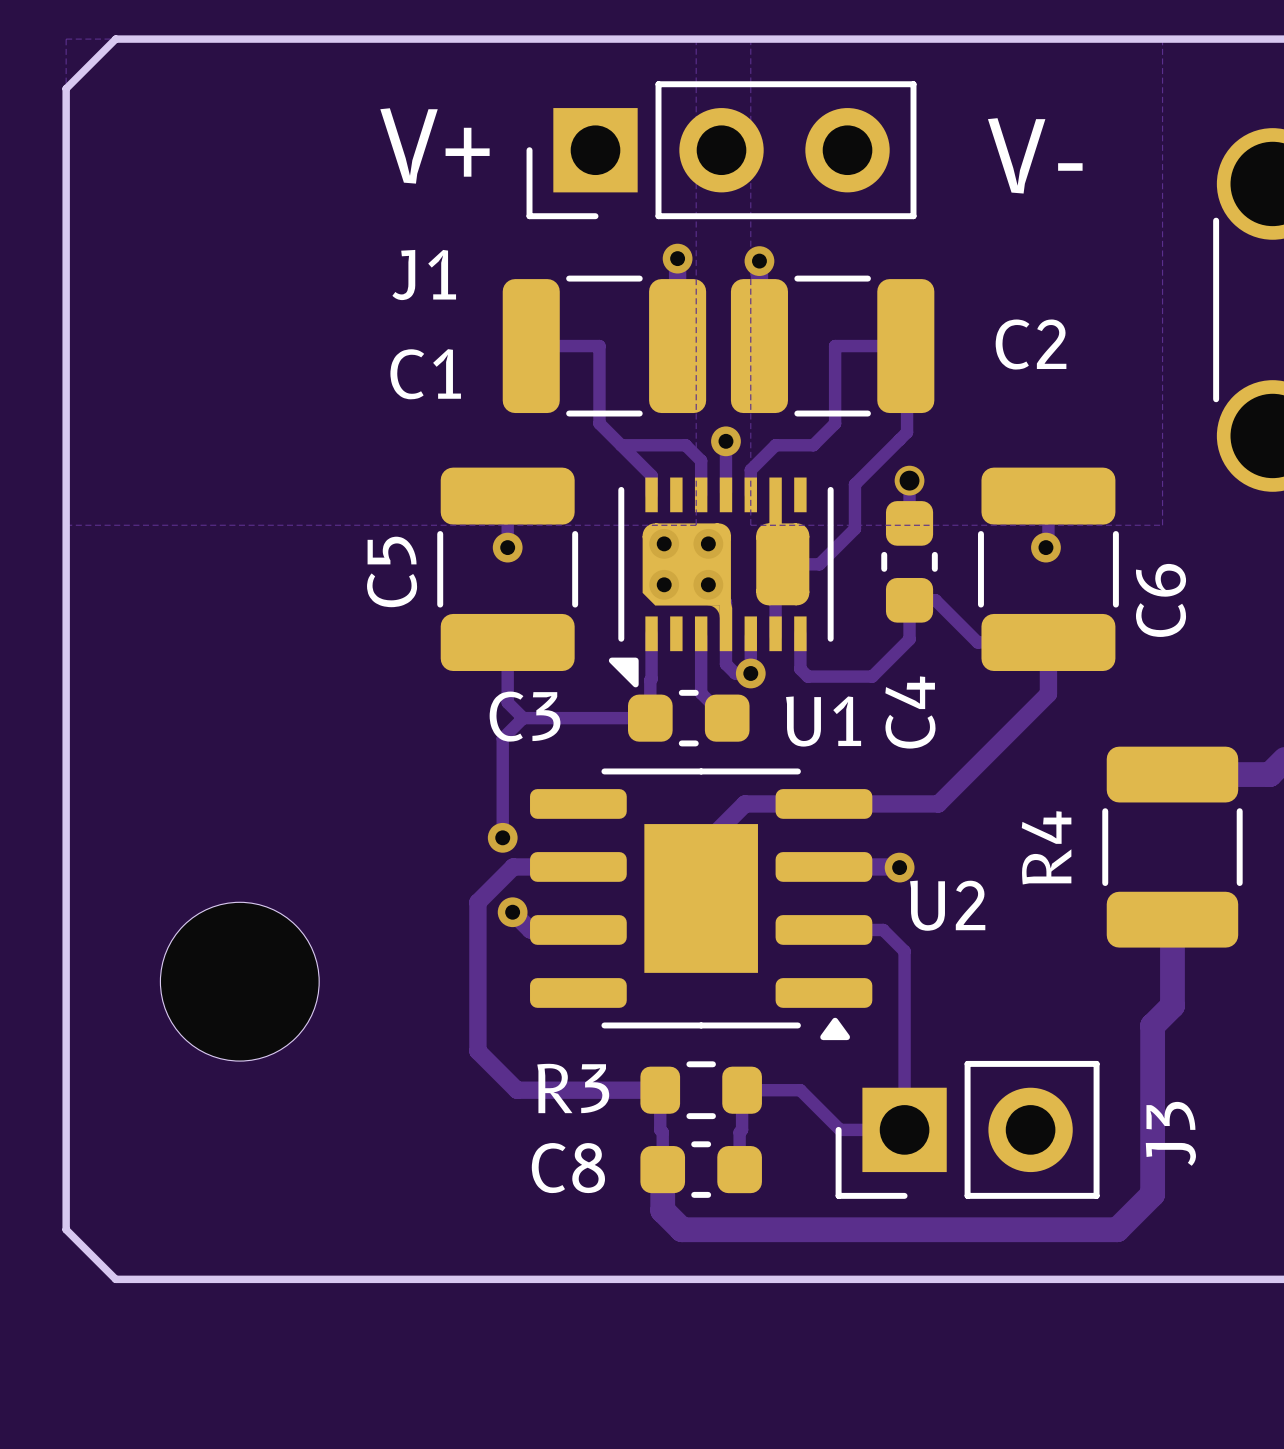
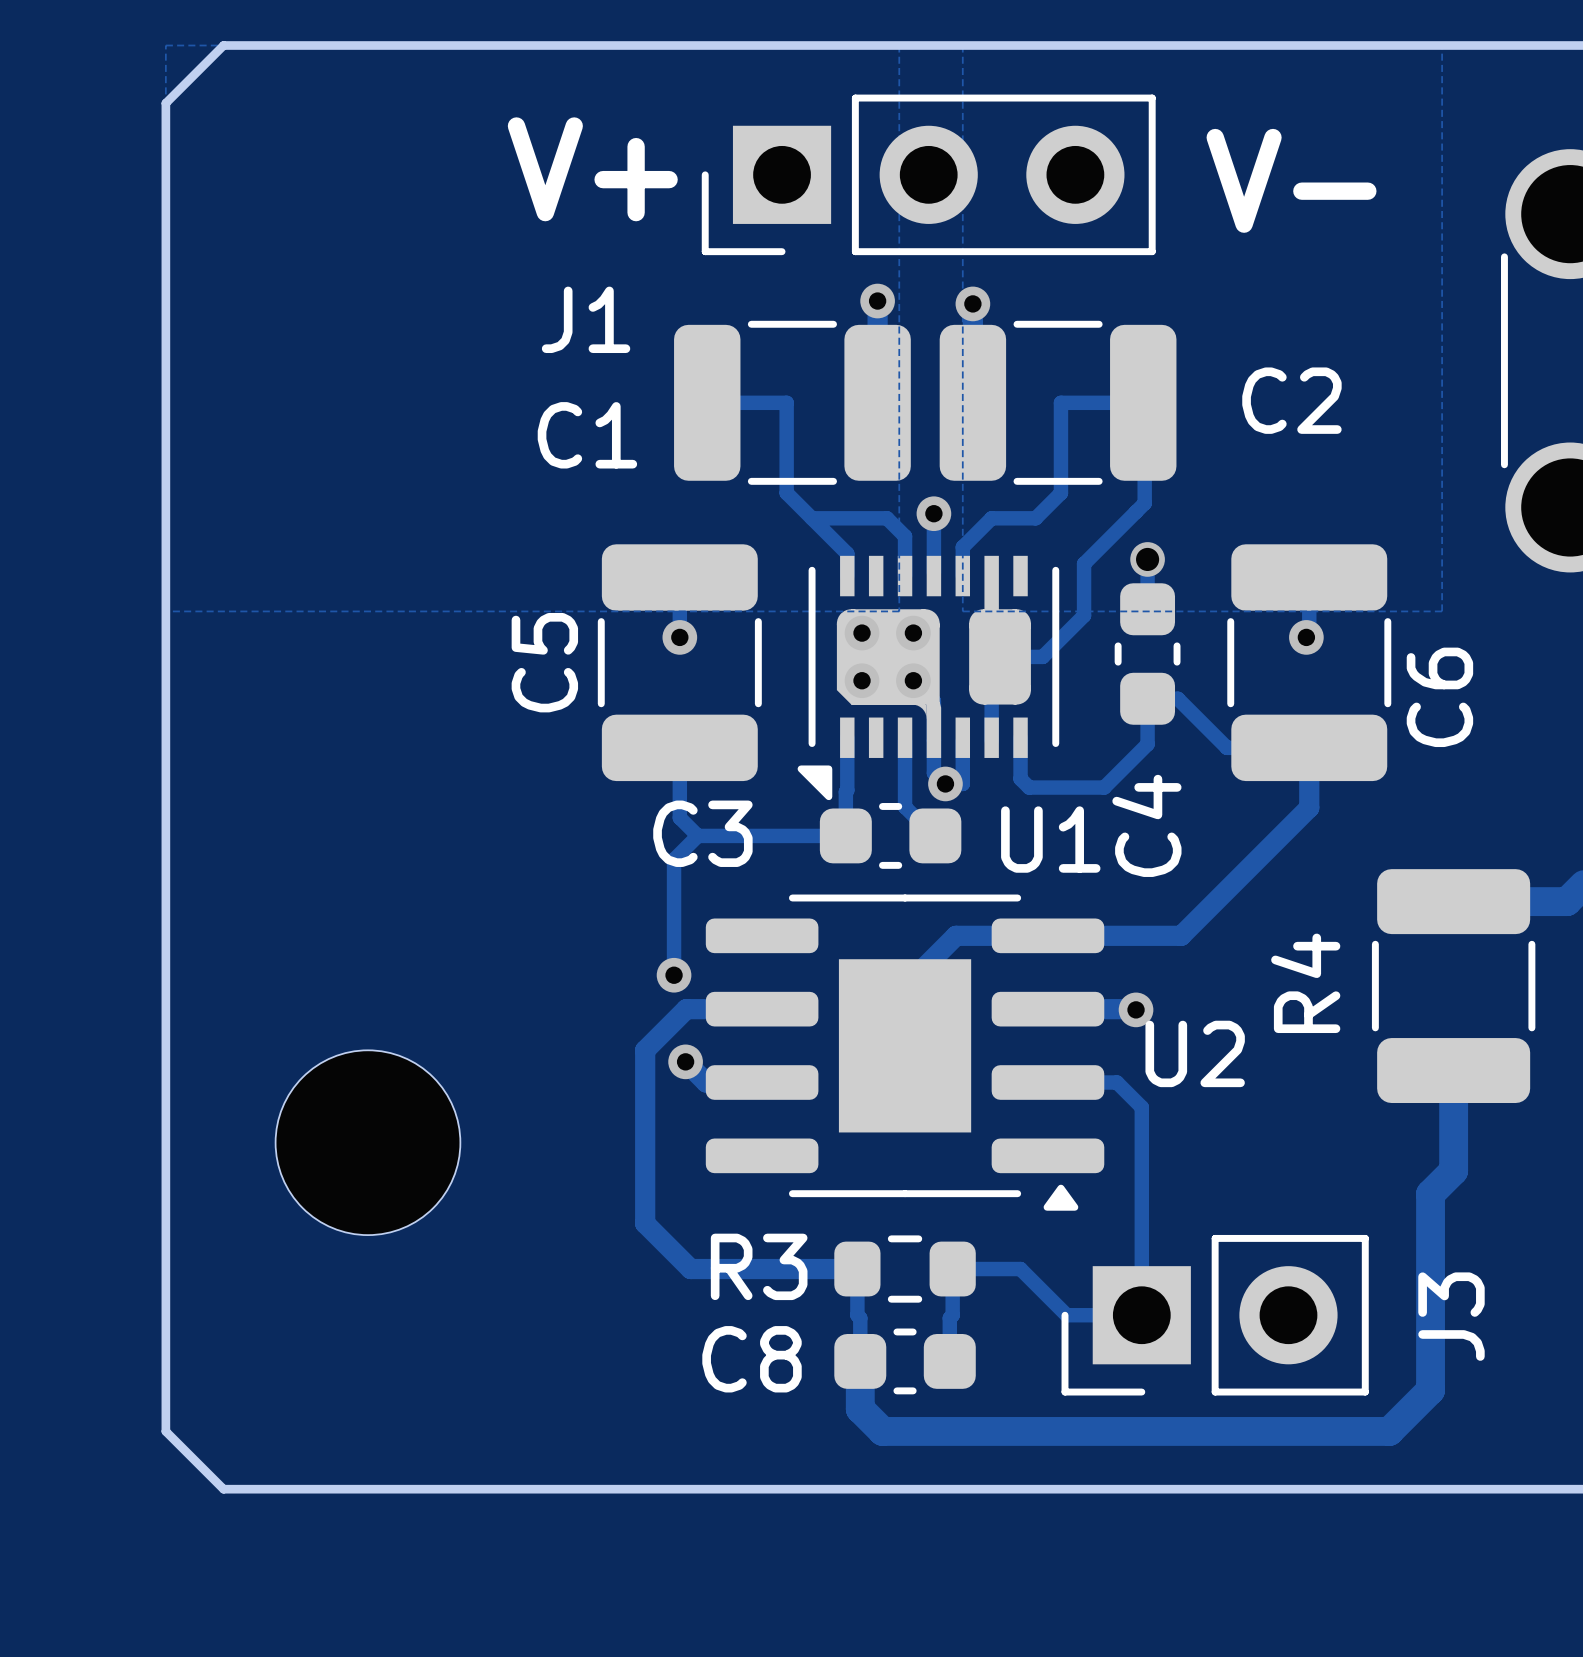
via position: (750, 673) -> (945, 783)

